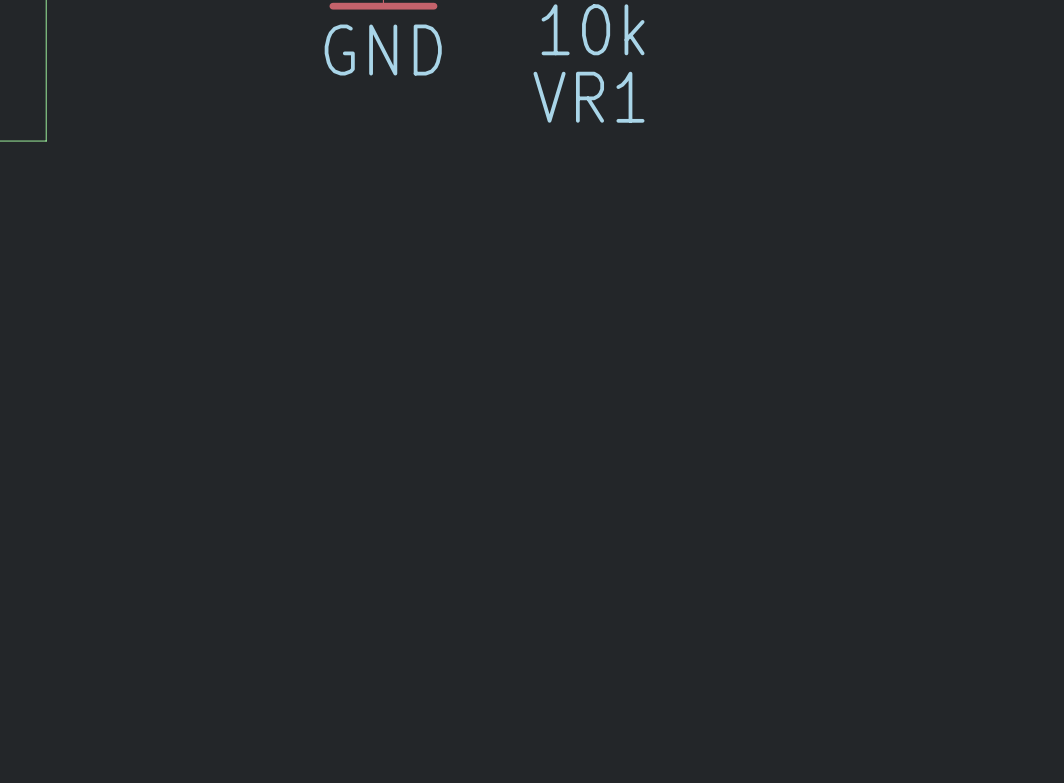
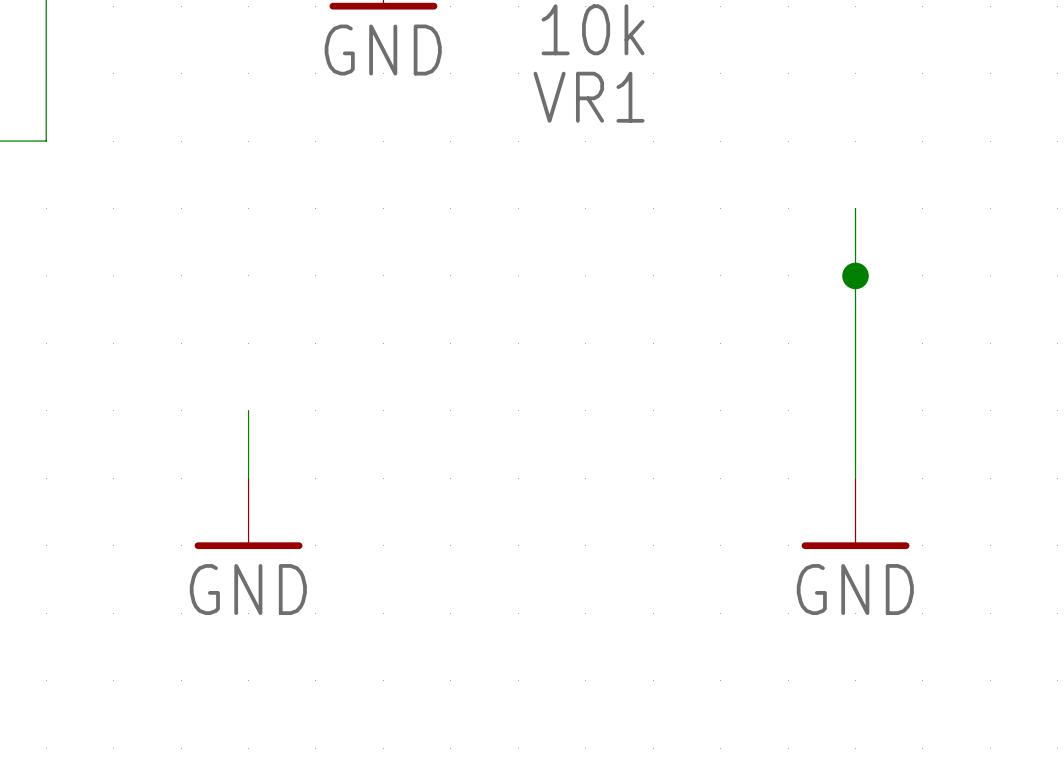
wire: none -> (855, 208) (855, 478)
junction: none -> (855, 275)
wire: none -> (248, 410) (248, 478)
power symbol: none -> GND (248, 513)
power symbol: none -> GND (855, 513)

